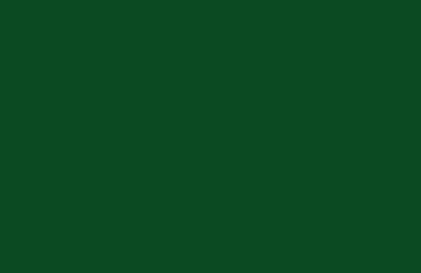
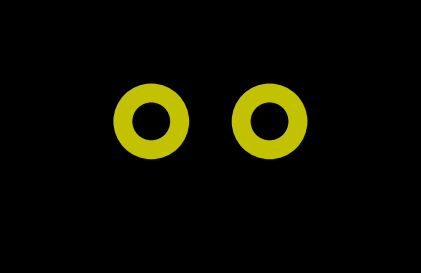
part: none -> (210, 121)

